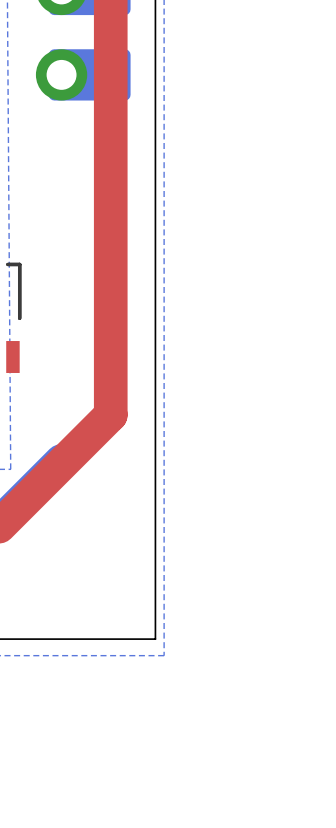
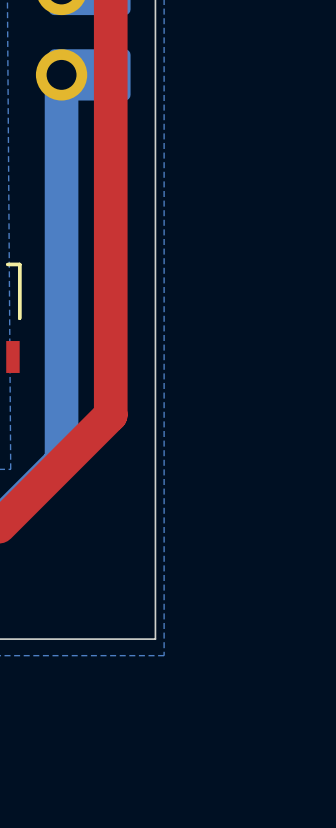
bottom track: none -> (61, 74) (61, 460)

